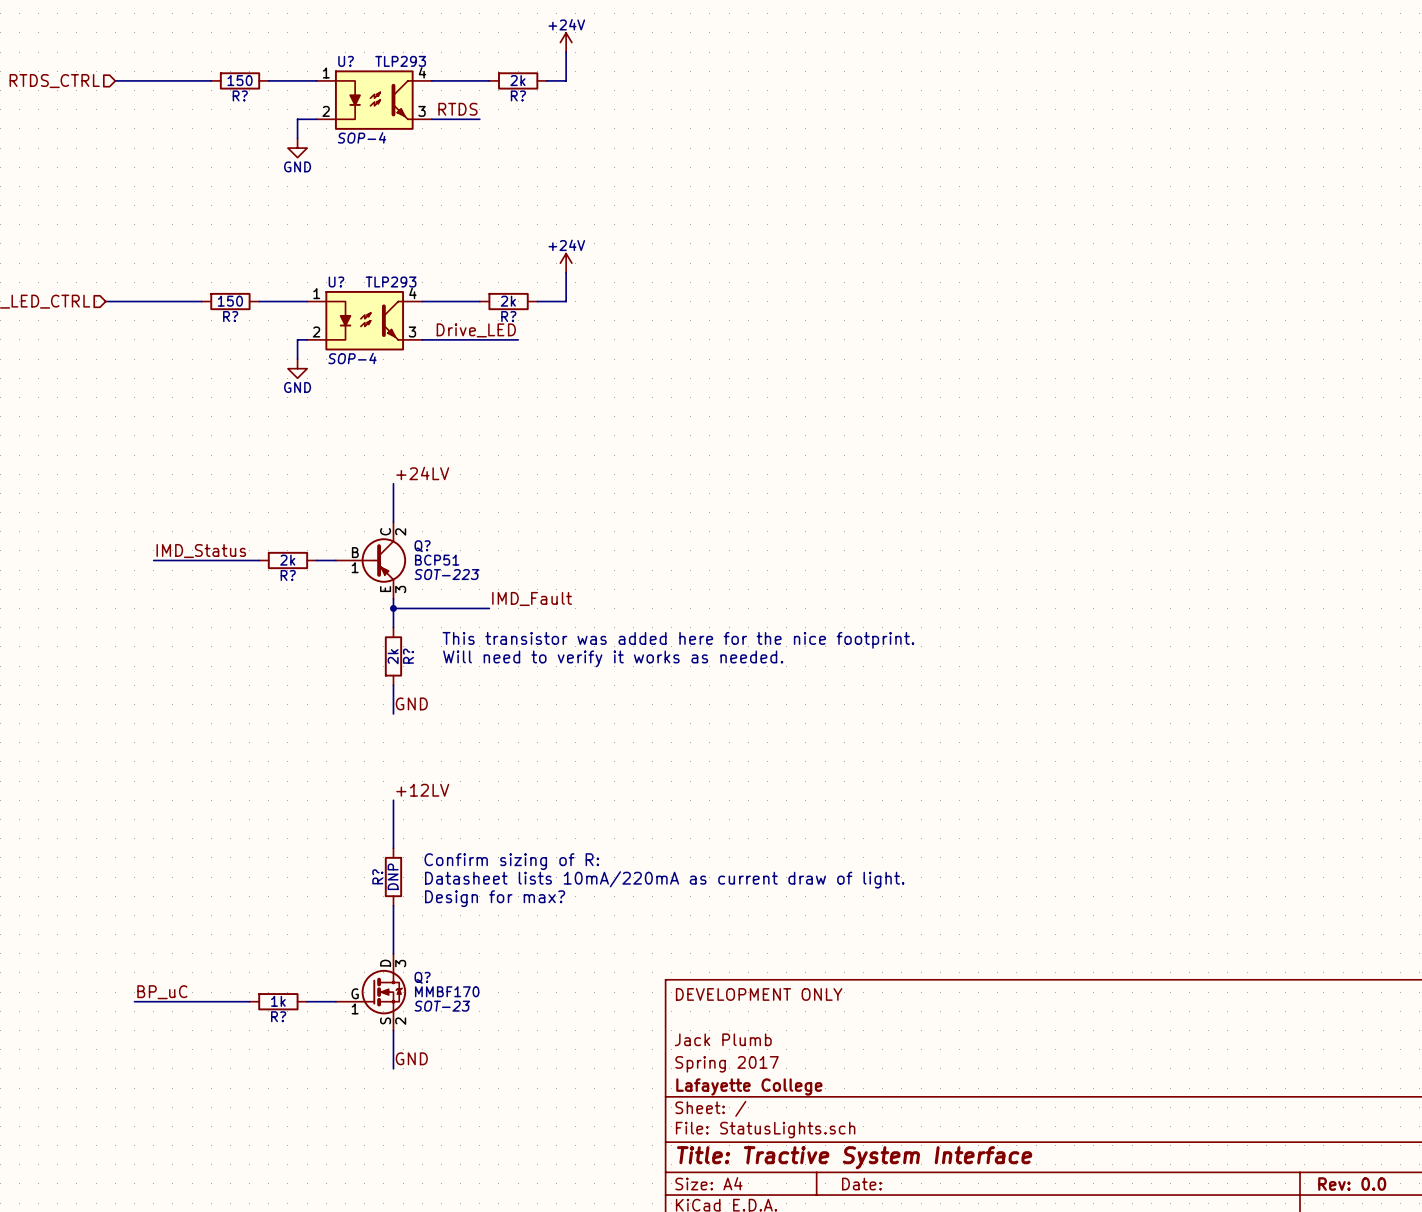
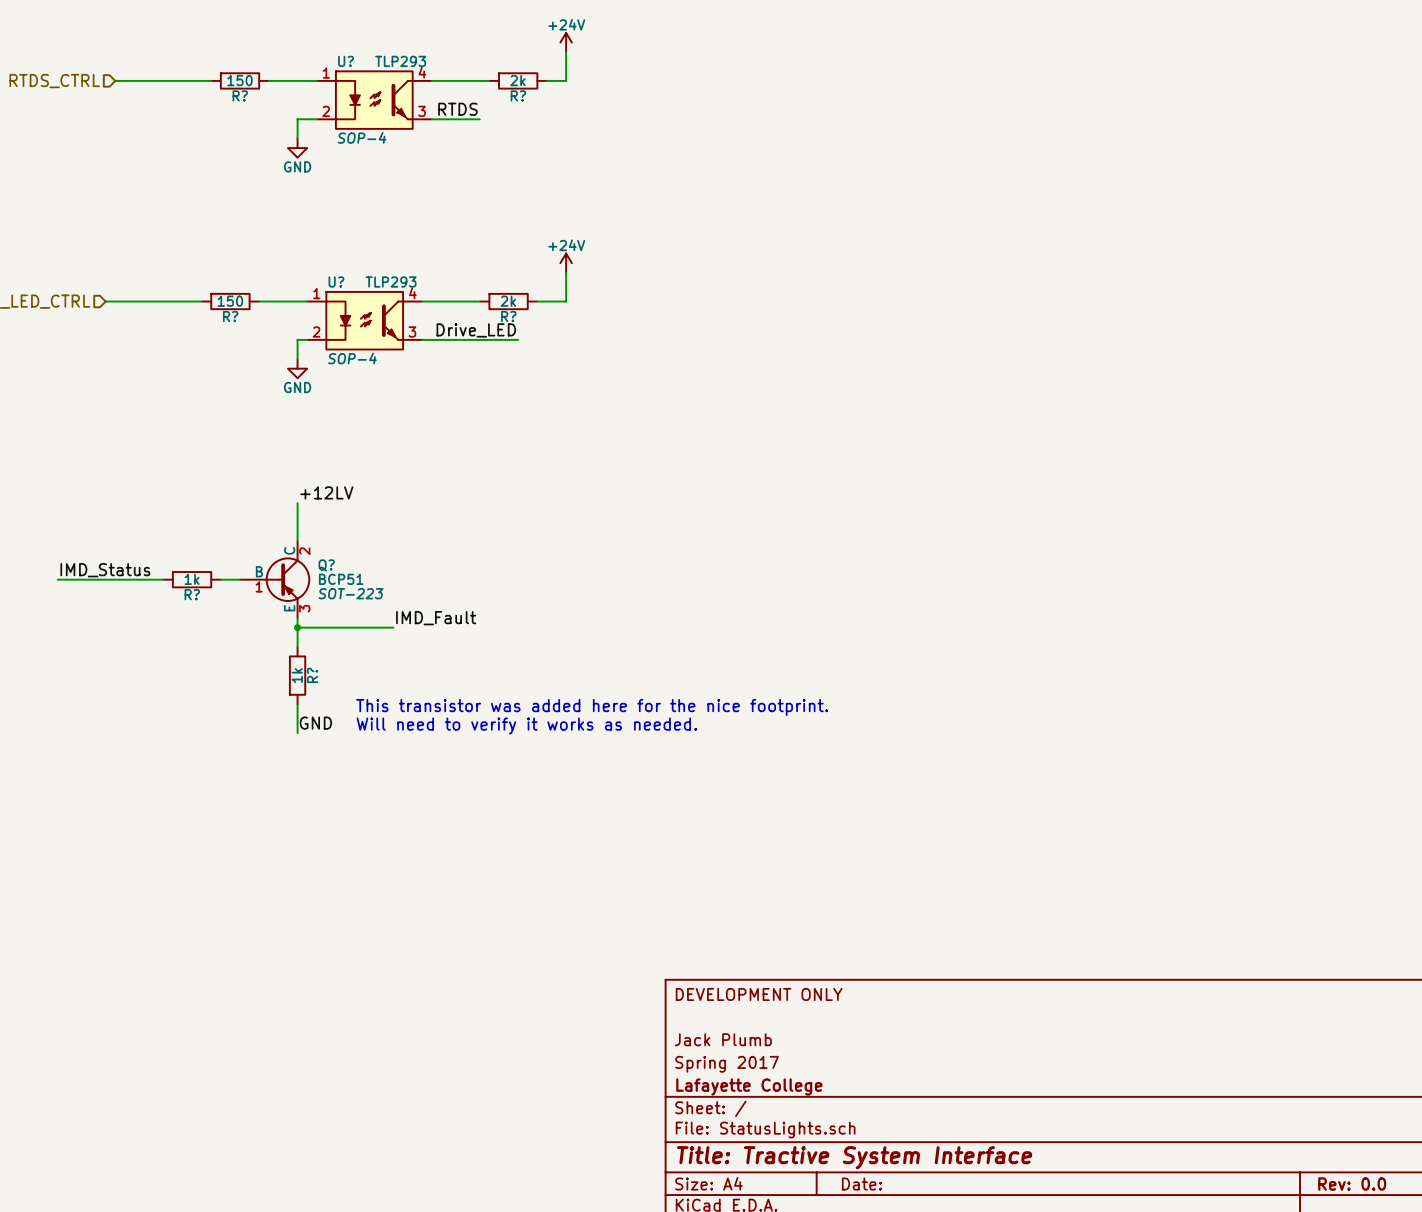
label: +24LV (422, 473) -> none
wire: (393, 483) (393, 522) -> (297, 502) (297, 541)
label: none -> +12LV (326, 492)
label position: IMD_Status (201, 551) -> IMD_Status (105, 570)
wire: (153, 560) (259, 560) -> (57, 579) (163, 579)
R?: 2k (287, 560) -> none
wire: (316, 560) (335, 560) -> (220, 579) (240, 579)
Q? position: (371, 560) -> (275, 579)
R?: none -> 1k (192, 579)
wire: (393, 598) (393, 627) -> (297, 627) (393, 627)
label position: IMD_Fault (532, 598) -> IMD_Fault (436, 618)
wire: (393, 608) (489, 608) -> none
junction: (393, 608) -> none
wire: none -> (297, 618) (297, 646)
junction: none -> (297, 627)
text position: This transistor was added here for the nice footprint. (678, 640) -> This transistor was added here for the nice footprint. (592, 707)
R?: 2k (393, 656) -> none
text position: Will need to verify it works as needed. (613, 658) -> Will need to verify it works as needed. (526, 726)
R?: none -> 1k (297, 675)
wire: (393, 685) (393, 713) -> (297, 704) (297, 733)
label position: GND (411, 703) -> GND (315, 723)
label: +12LV (422, 790) -> none
wire: (393, 800) (393, 848) -> none
text: Confirm sizing of R: (511, 861) -> none
R?: DNP (393, 877) -> none
text: Datasheet lists 10mA/220mA as current draw of light. (664, 879) -> none
text: Design for max? (495, 898) -> none
wire: (393, 905) (393, 953) -> none
label: BP_uC (162, 992) -> none
Q?: MMBF170 (371, 992) -> none
wire: (134, 1001) (249, 1001) -> none
R?: 1k (278, 1001) -> none
wire: (307, 1001) (335, 1001) -> none
wire: (393, 1030) (393, 1068) -> none
label: GND (411, 1058) -> none

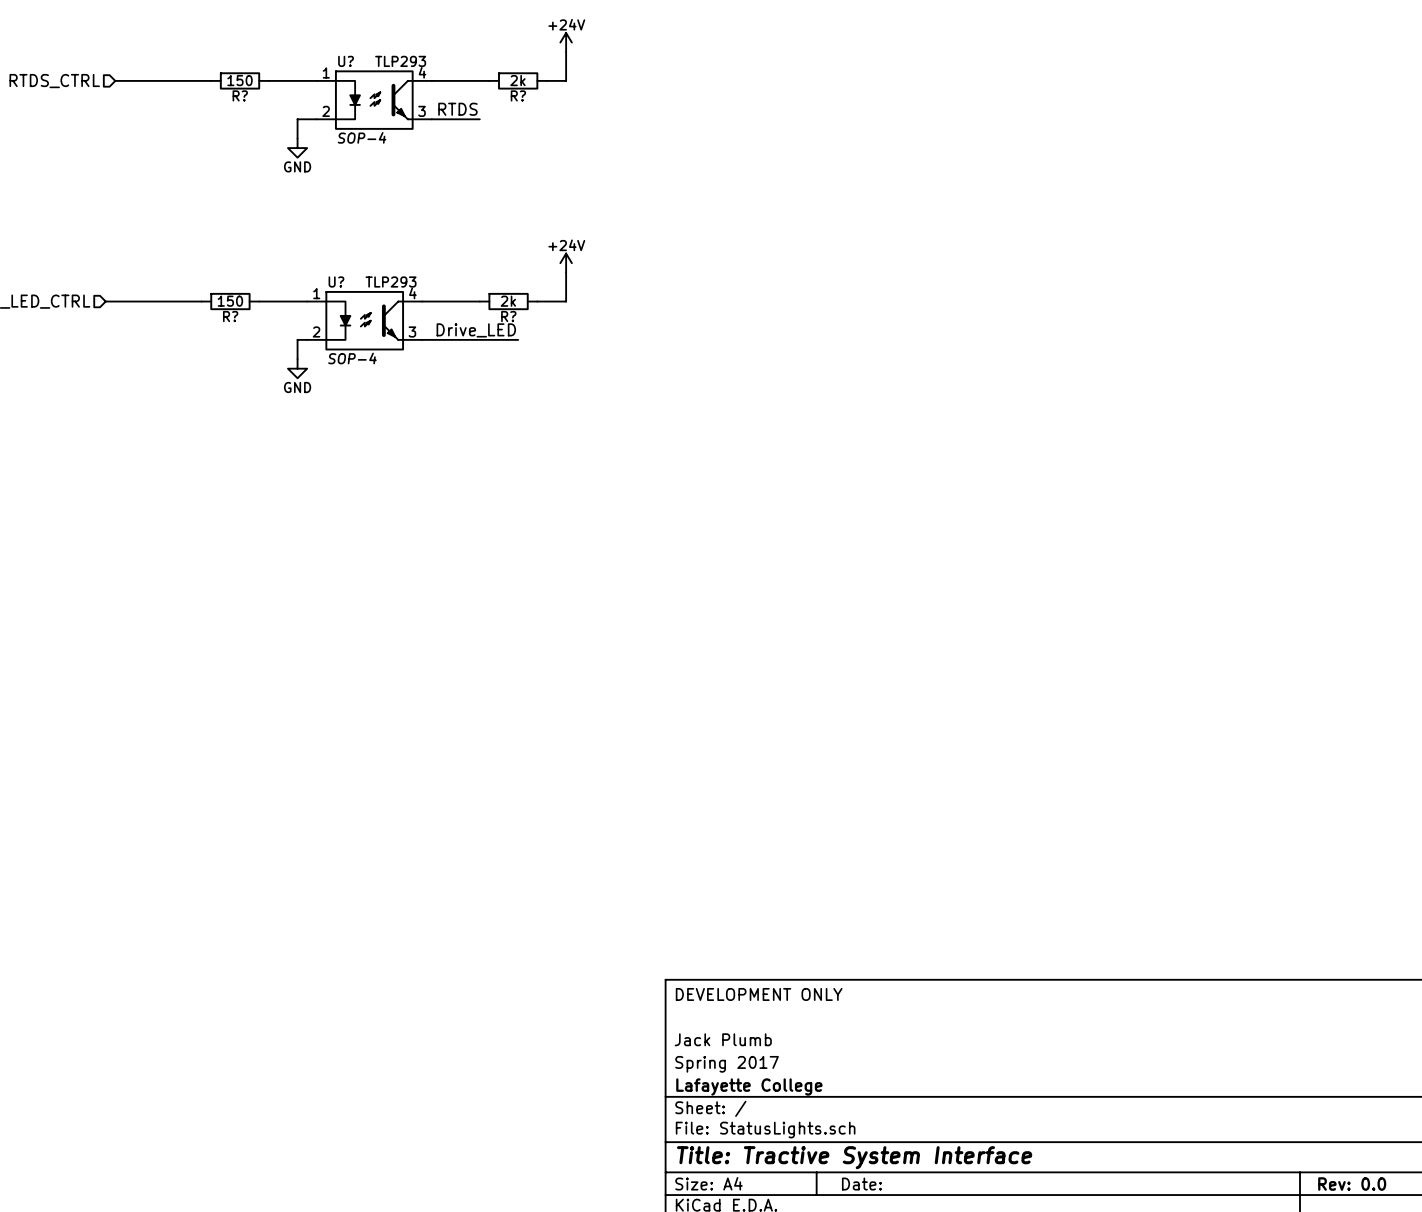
label: +12LV (326, 492) -> none
wire: (297, 502) (297, 541) -> none
label: IMD_Status (105, 570) -> none
wire: (57, 579) (163, 579) -> none
R?: 1k (192, 579) -> none
wire: (220, 579) (240, 579) -> none
Q?: BCP51 (275, 579) -> none
wire: (297, 618) (297, 646) -> none
label: IMD_Fault (436, 618) -> none
wire: (297, 627) (393, 627) -> none
junction: (297, 627) -> none
R?: 1k (297, 675) -> none
wire: (297, 704) (297, 733) -> none
text: This transistor was added here for the nice footprint. (592, 707) -> none
label: GND (315, 723) -> none
text: Will need to verify it works as needed. (526, 726) -> none

